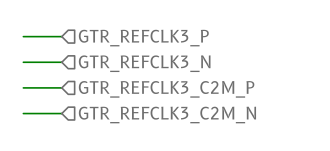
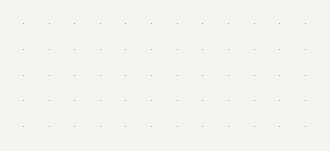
wire: (23, 36) (61, 36) -> none
hierarchical label: GTR_REFCLK3_P (143, 38) -> none
wire: (23, 62) (61, 62) -> none
hierarchical label: GTR_REFCLK3_N (144, 63) -> none
wire: (23, 87) (61, 87) -> none
hierarchical label: GTR_REFCLK3_C2M_P (166, 89) -> none
wire: (23, 113) (61, 113) -> none
hierarchical label: GTR_REFCLK3_C2M_N (167, 114) -> none

